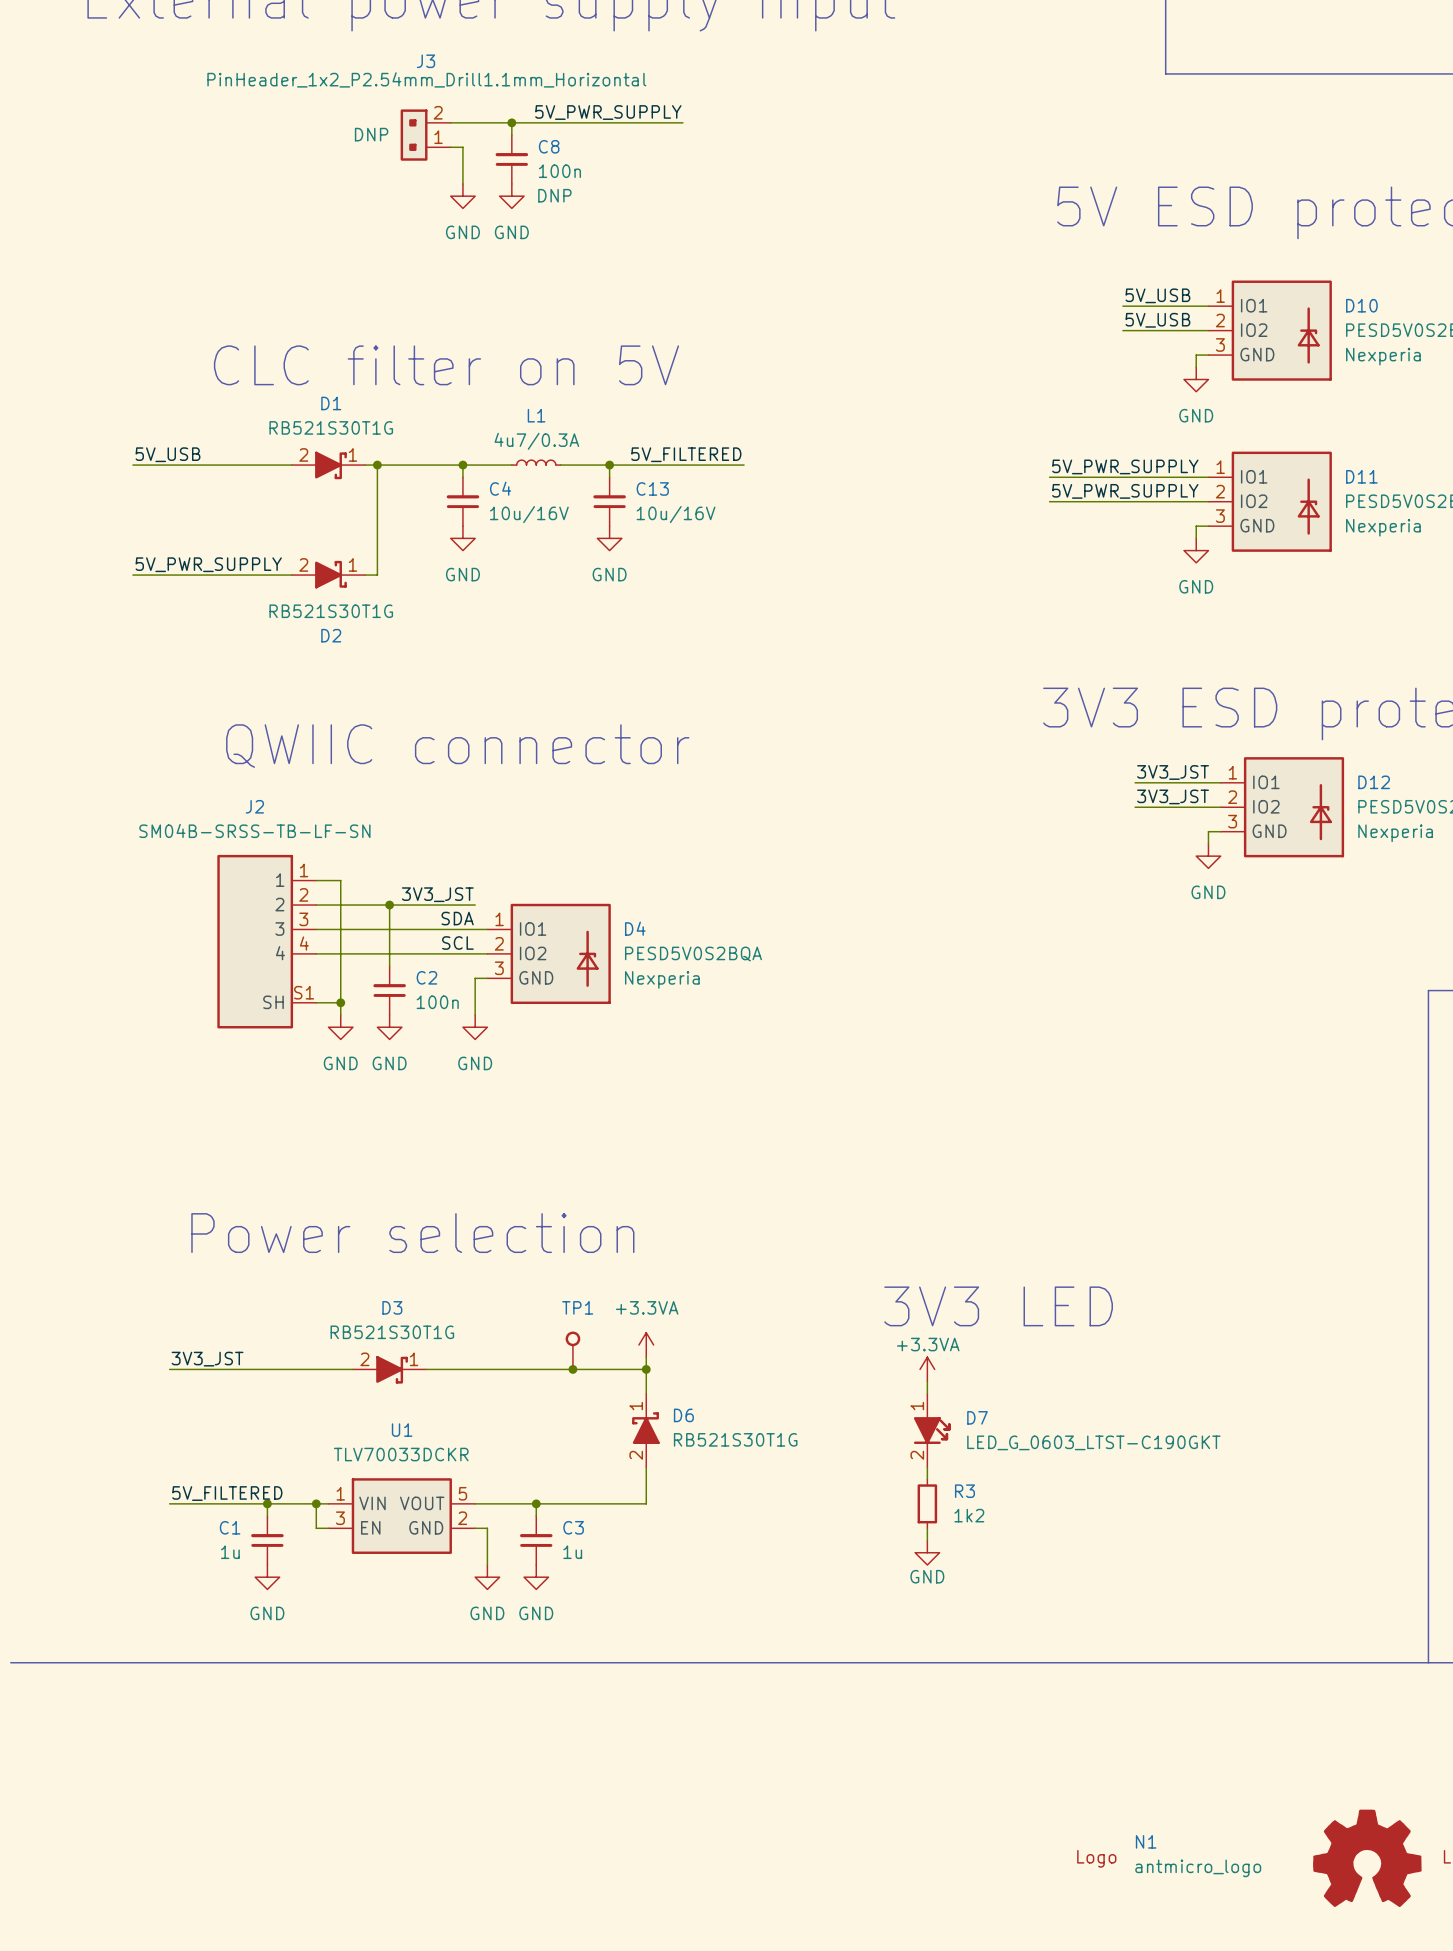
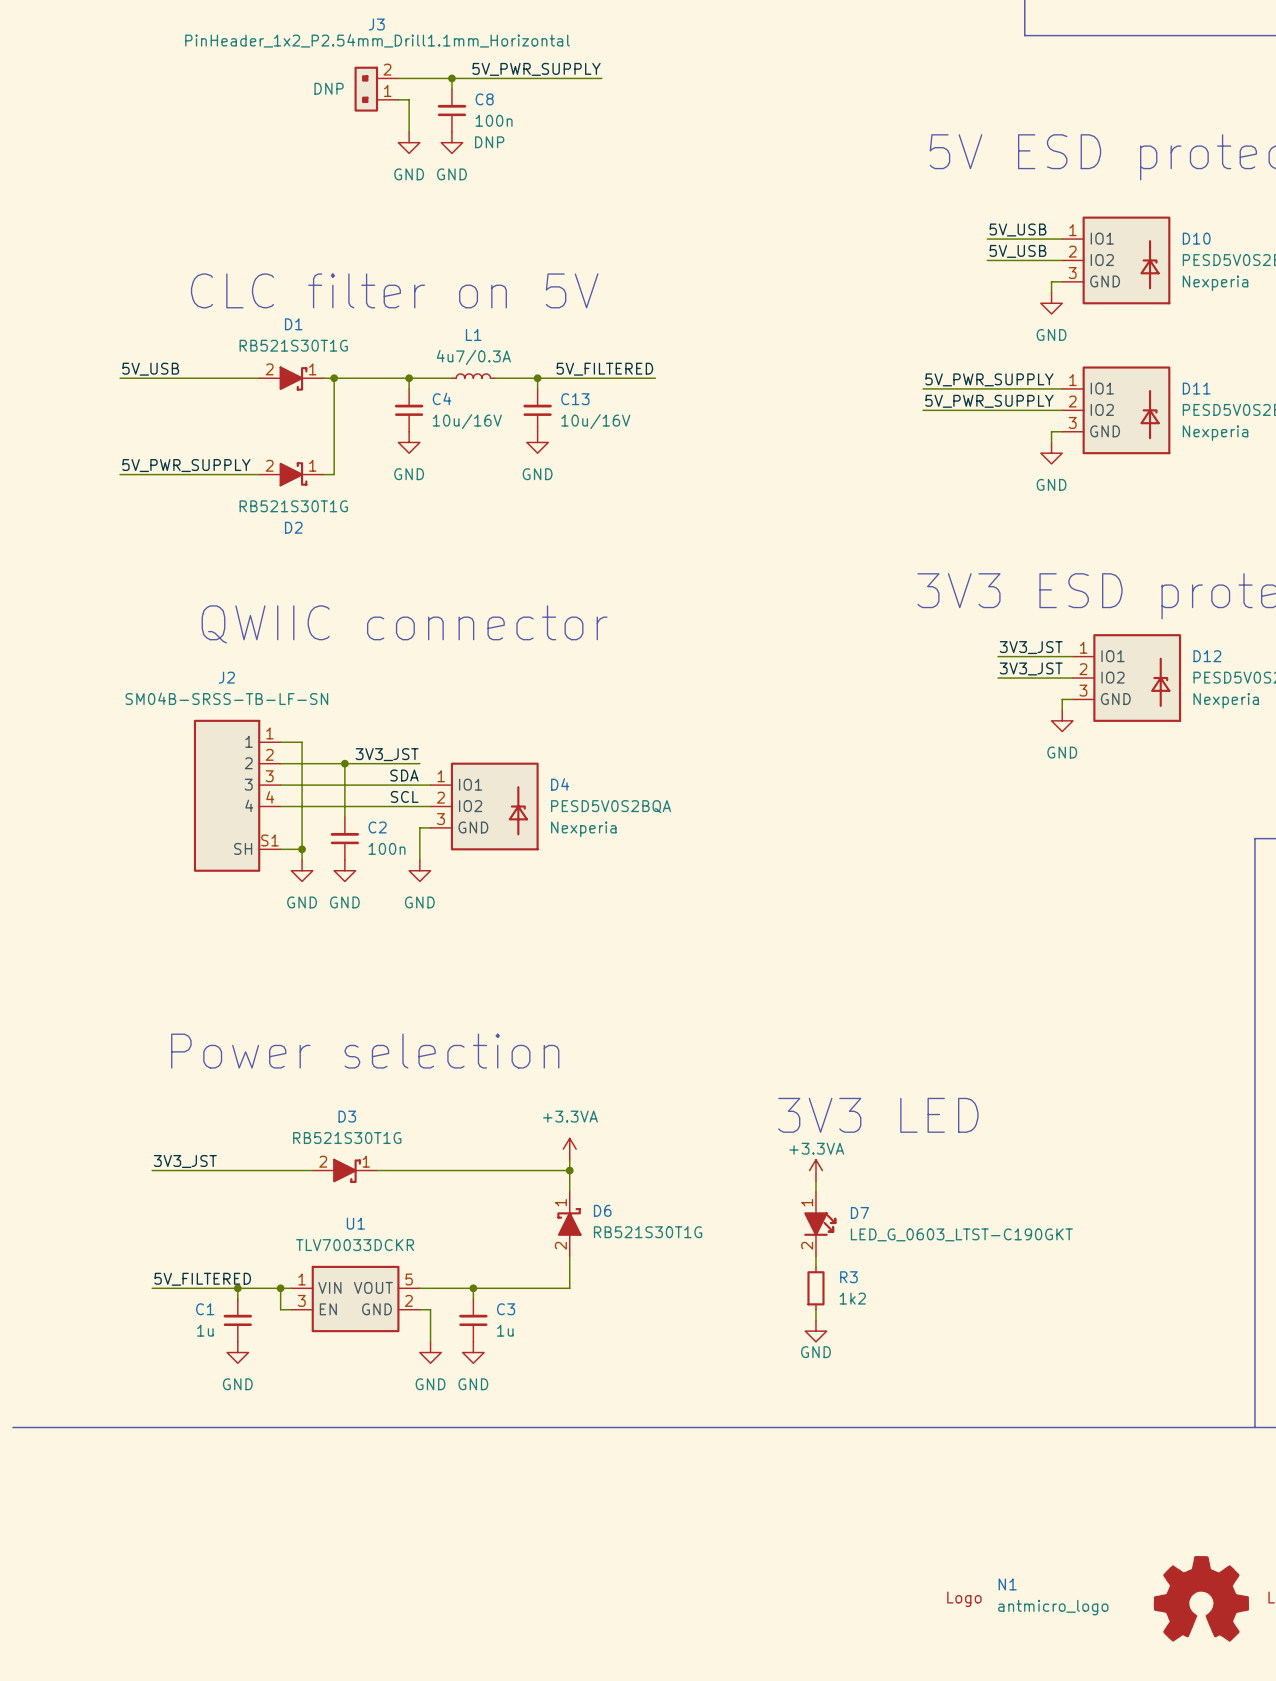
TP1: (572, 1350) -> none
junction: (572, 1369) -> none

